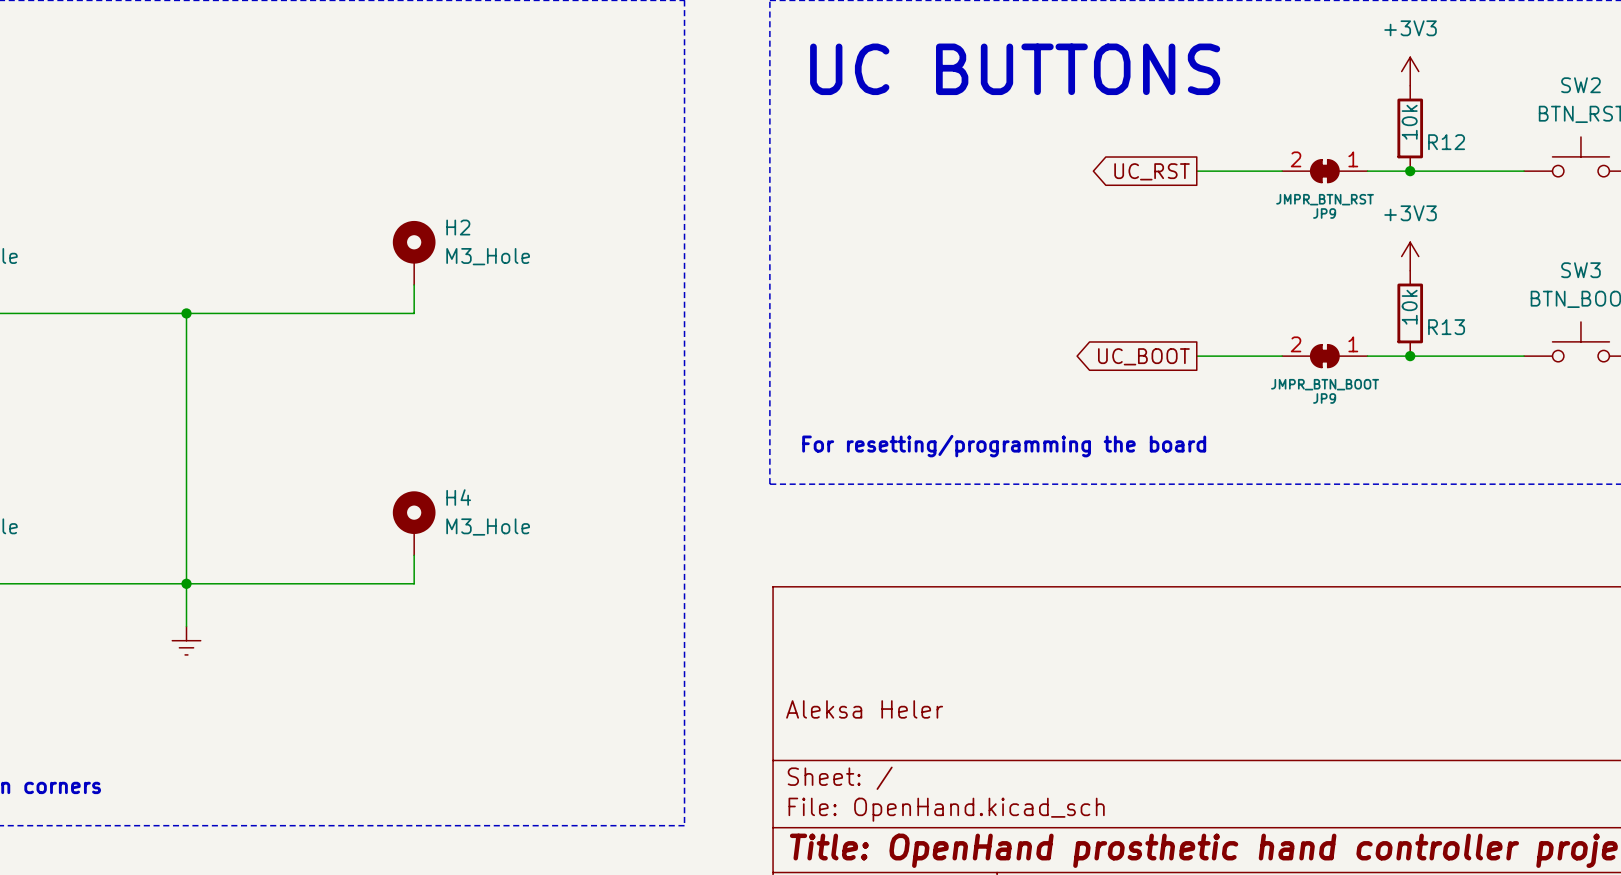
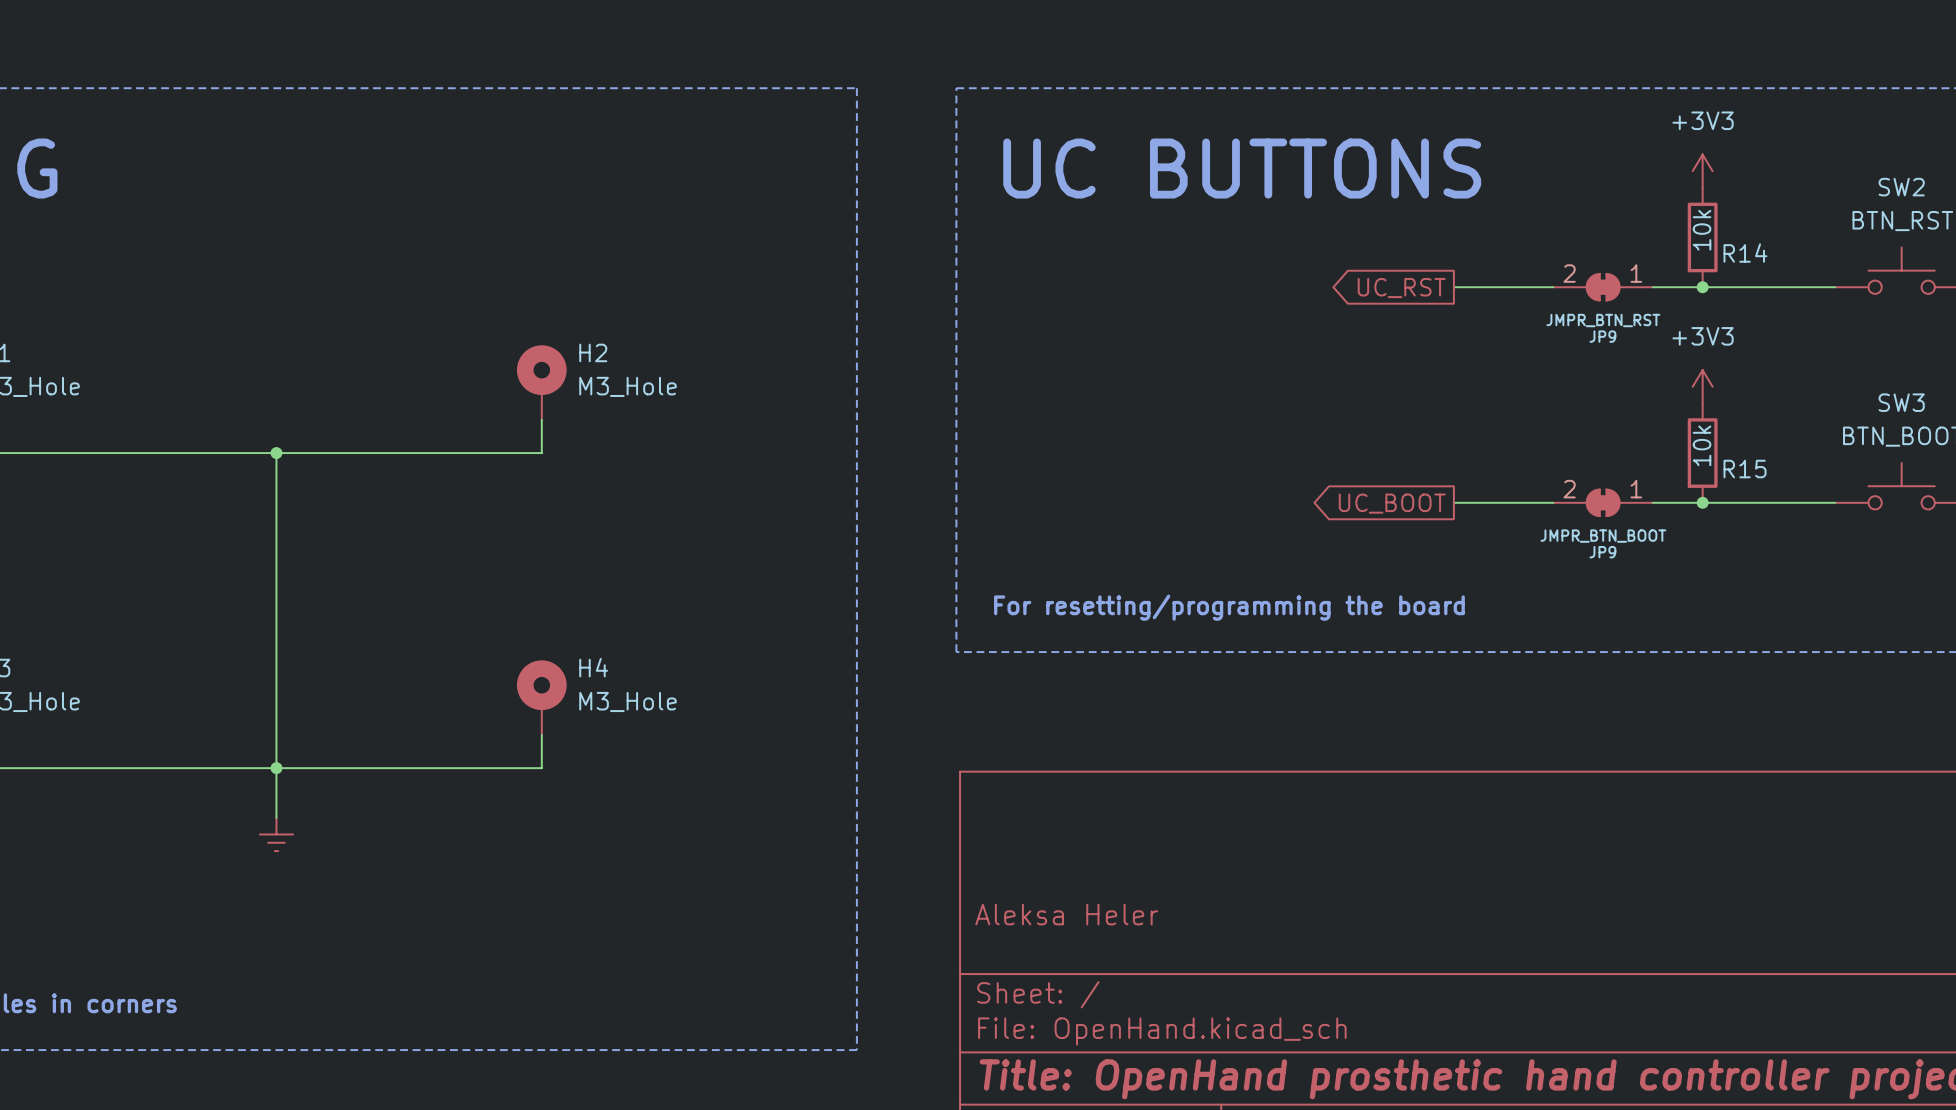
R12 name: R12 (1446, 142) -> R14 (1745, 253)
R13 name: R13 (1446, 327) -> R15 (1745, 469)

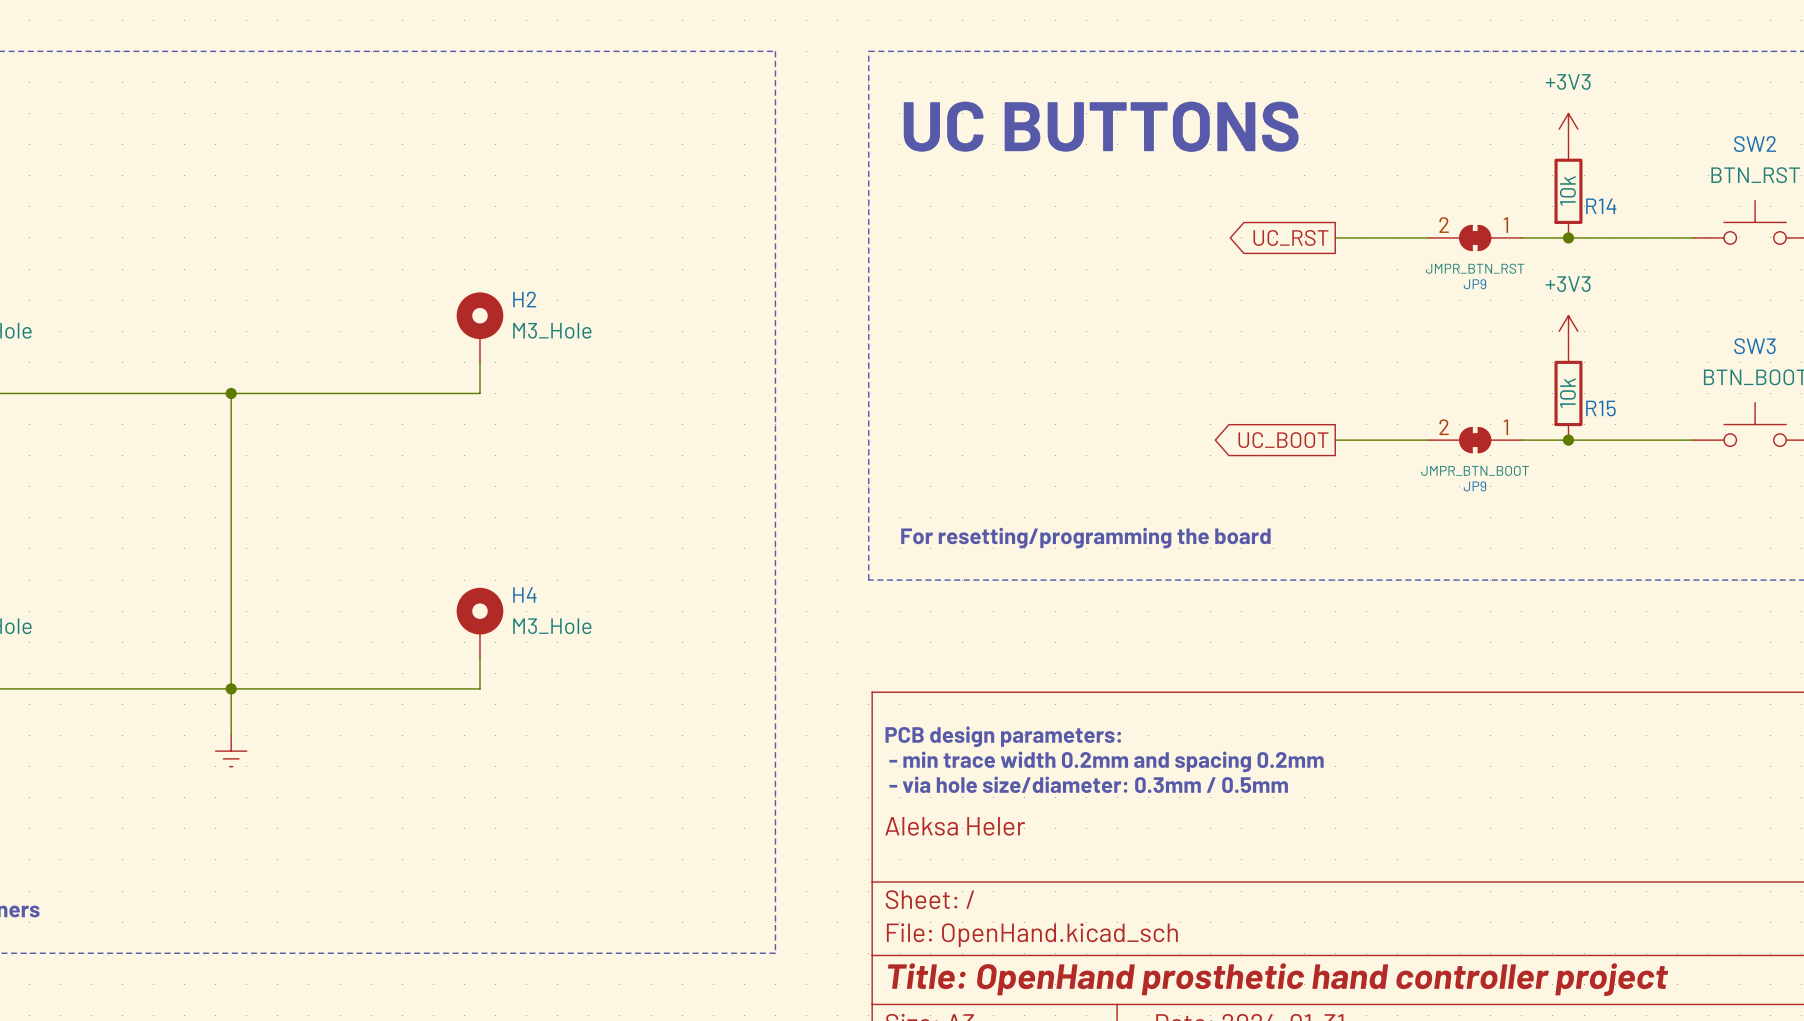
text: none -> PCB design parameters: (1003, 736)
text: none -> - min trace width 0.2mm and spacing 0.2mm (1106, 761)
text: none -> - via hole size/diameter: 0.3mm / 0.5mm (1088, 784)

